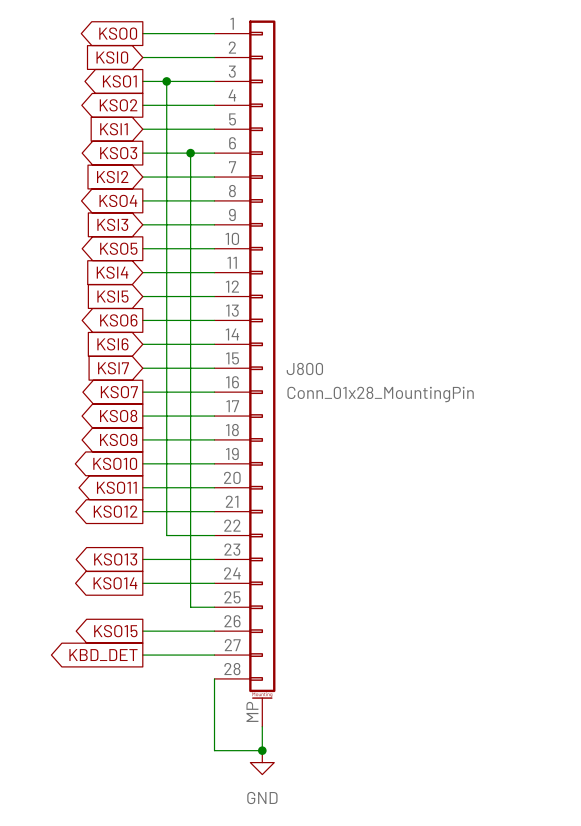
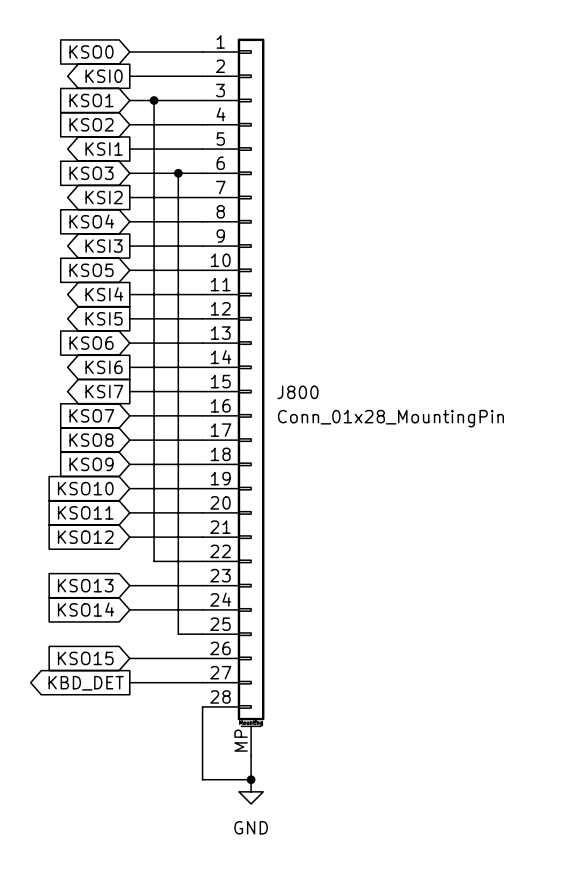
global label shape: output (118, 33) -> input (91, 52)
global label shape: input (112, 57) -> output (104, 76)
global label shape: output (119, 81) -> input (91, 100)
global label shape: output (118, 105) -> input (91, 124)
global label shape: input (113, 129) -> output (104, 149)
global label shape: output (118, 153) -> input (91, 173)
global label shape: input (112, 177) -> output (104, 197)
global label shape: output (118, 200) -> input (91, 221)
global label shape: input (112, 224) -> output (104, 246)
global label shape: output (118, 248) -> input (91, 270)
global label shape: input (112, 272) -> output (104, 294)
global label shape: input (112, 296) -> output (104, 318)
global label shape: output (118, 320) -> input (91, 343)
global label shape: input (112, 344) -> output (104, 367)
global label shape: input (113, 368) -> output (104, 391)
global label shape: output (119, 392) -> input (91, 415)
global label shape: output (118, 416) -> input (91, 440)
global label shape: output (118, 439) -> input (91, 464)
global label shape: output (115, 463) -> input (85, 488)
global label shape: output (116, 487) -> input (85, 512)
global label shape: output (115, 511) -> input (85, 537)
global label shape: output (115, 559) -> input (85, 585)
global label shape: output (115, 583) -> input (86, 609)
global label shape: output (115, 631) -> input (85, 658)

